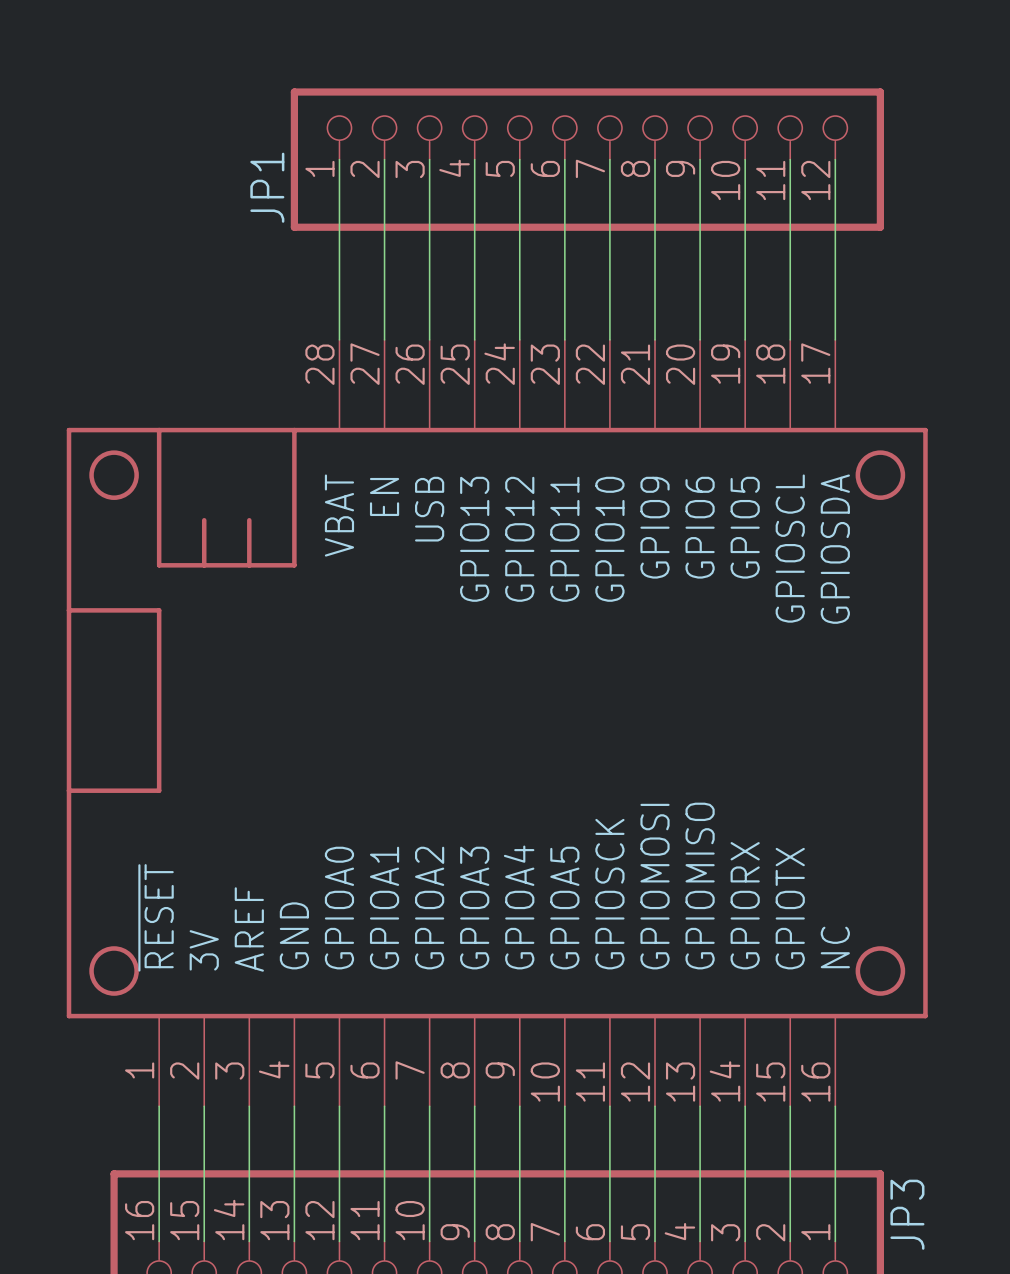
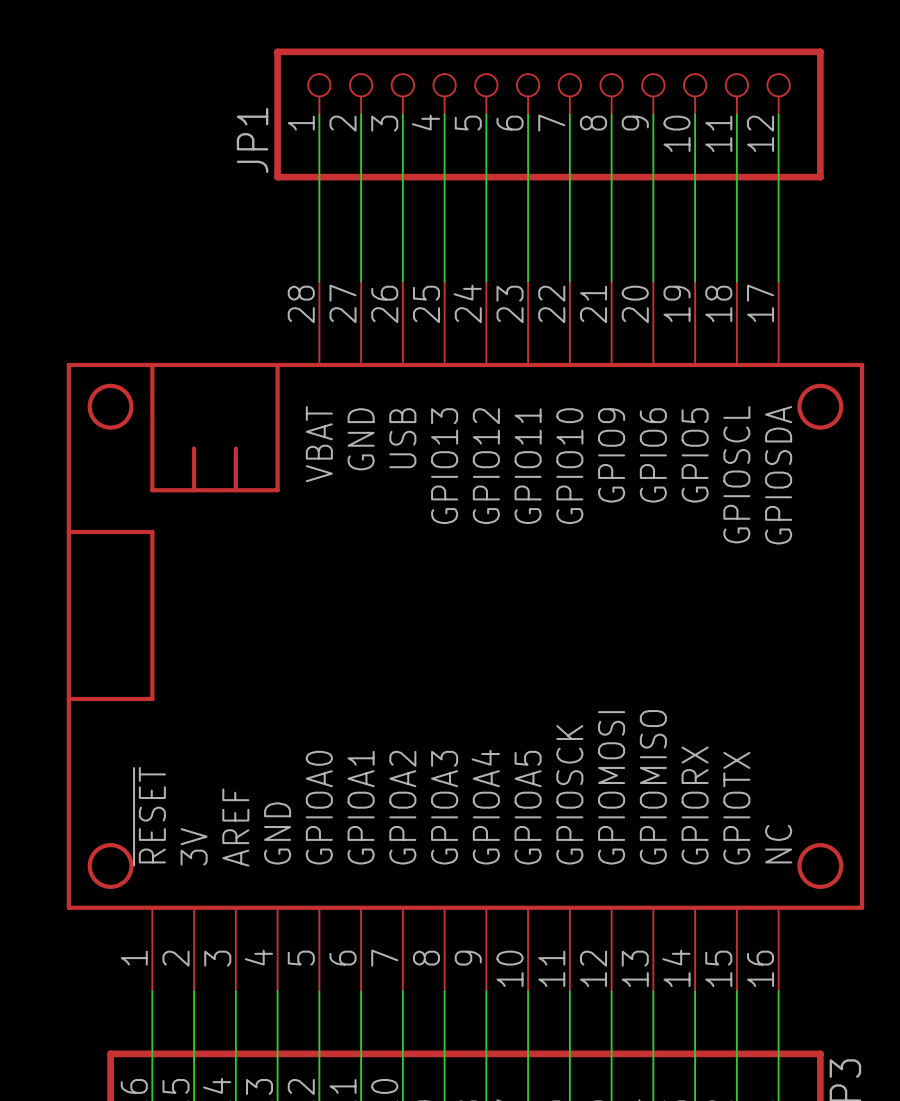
part pin name: EN (384, 496) -> GND (361, 439)

